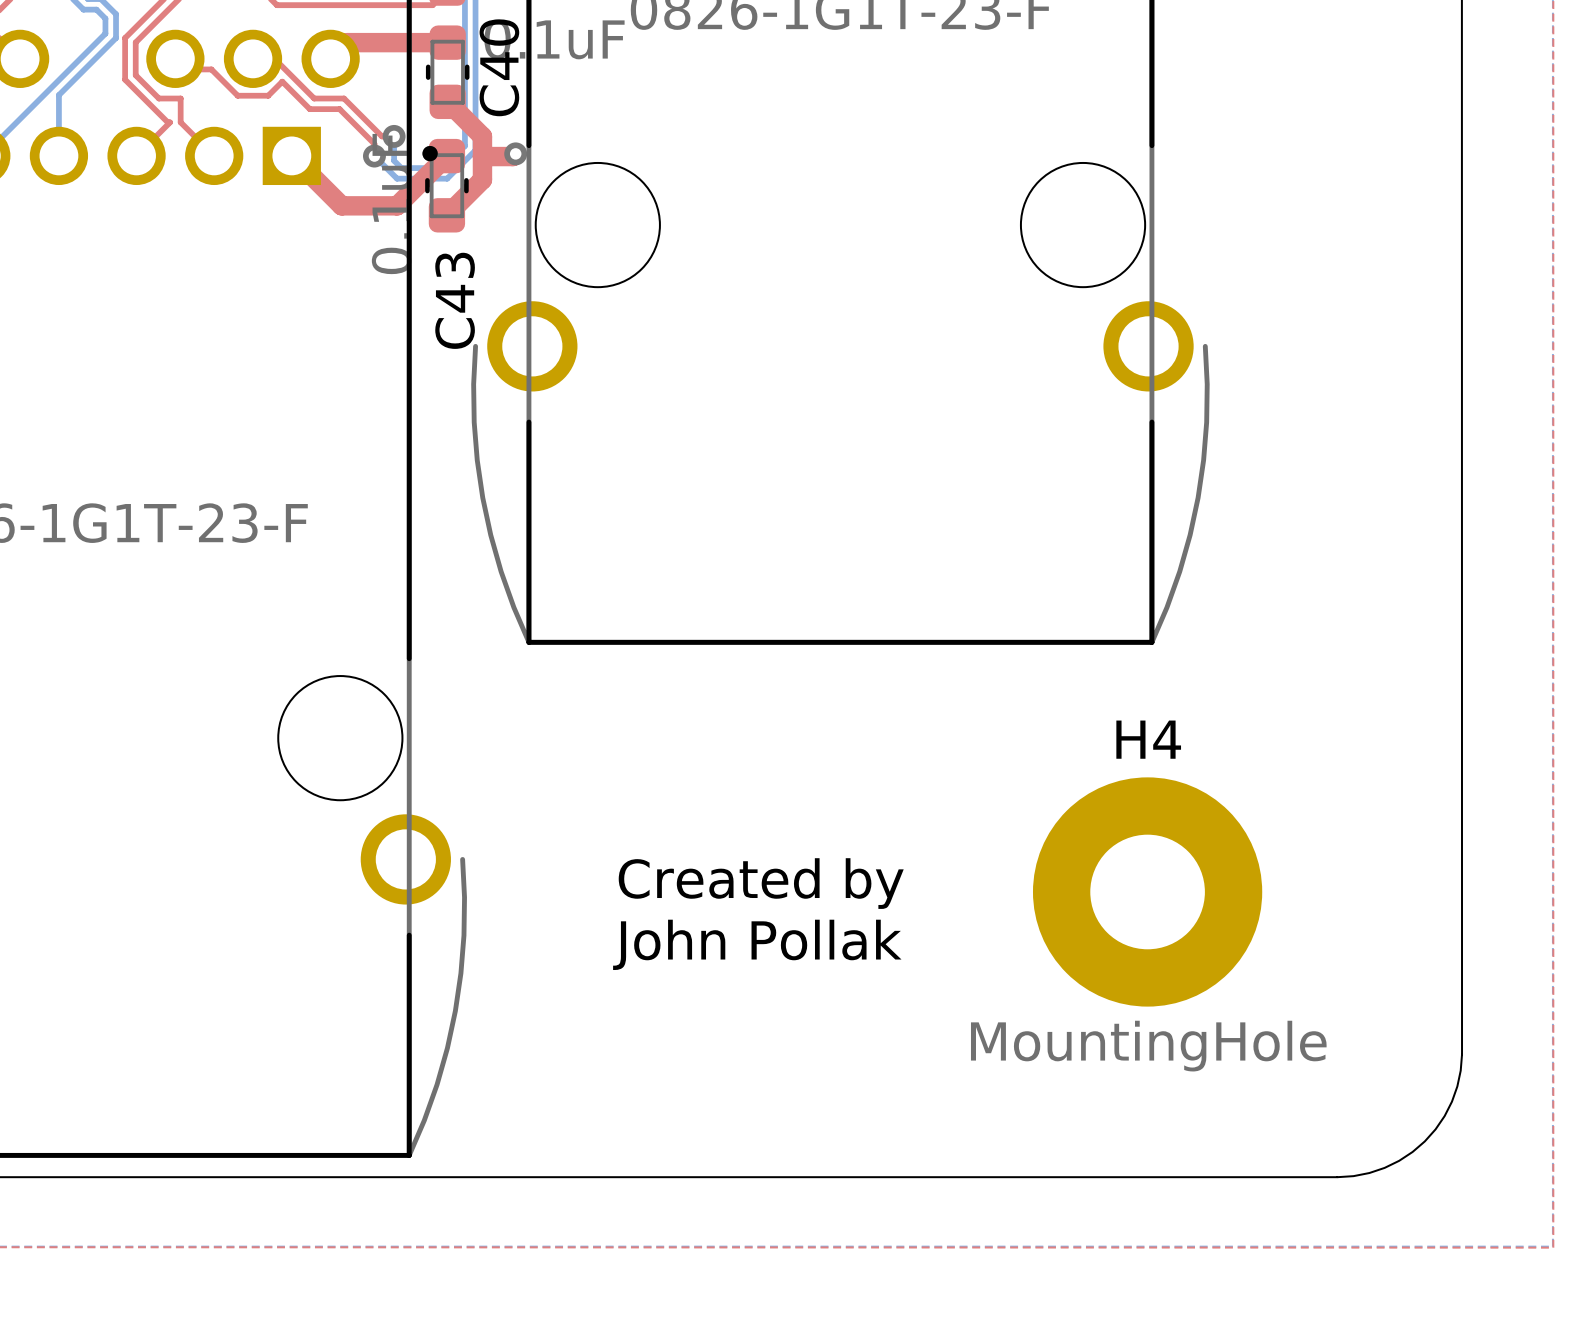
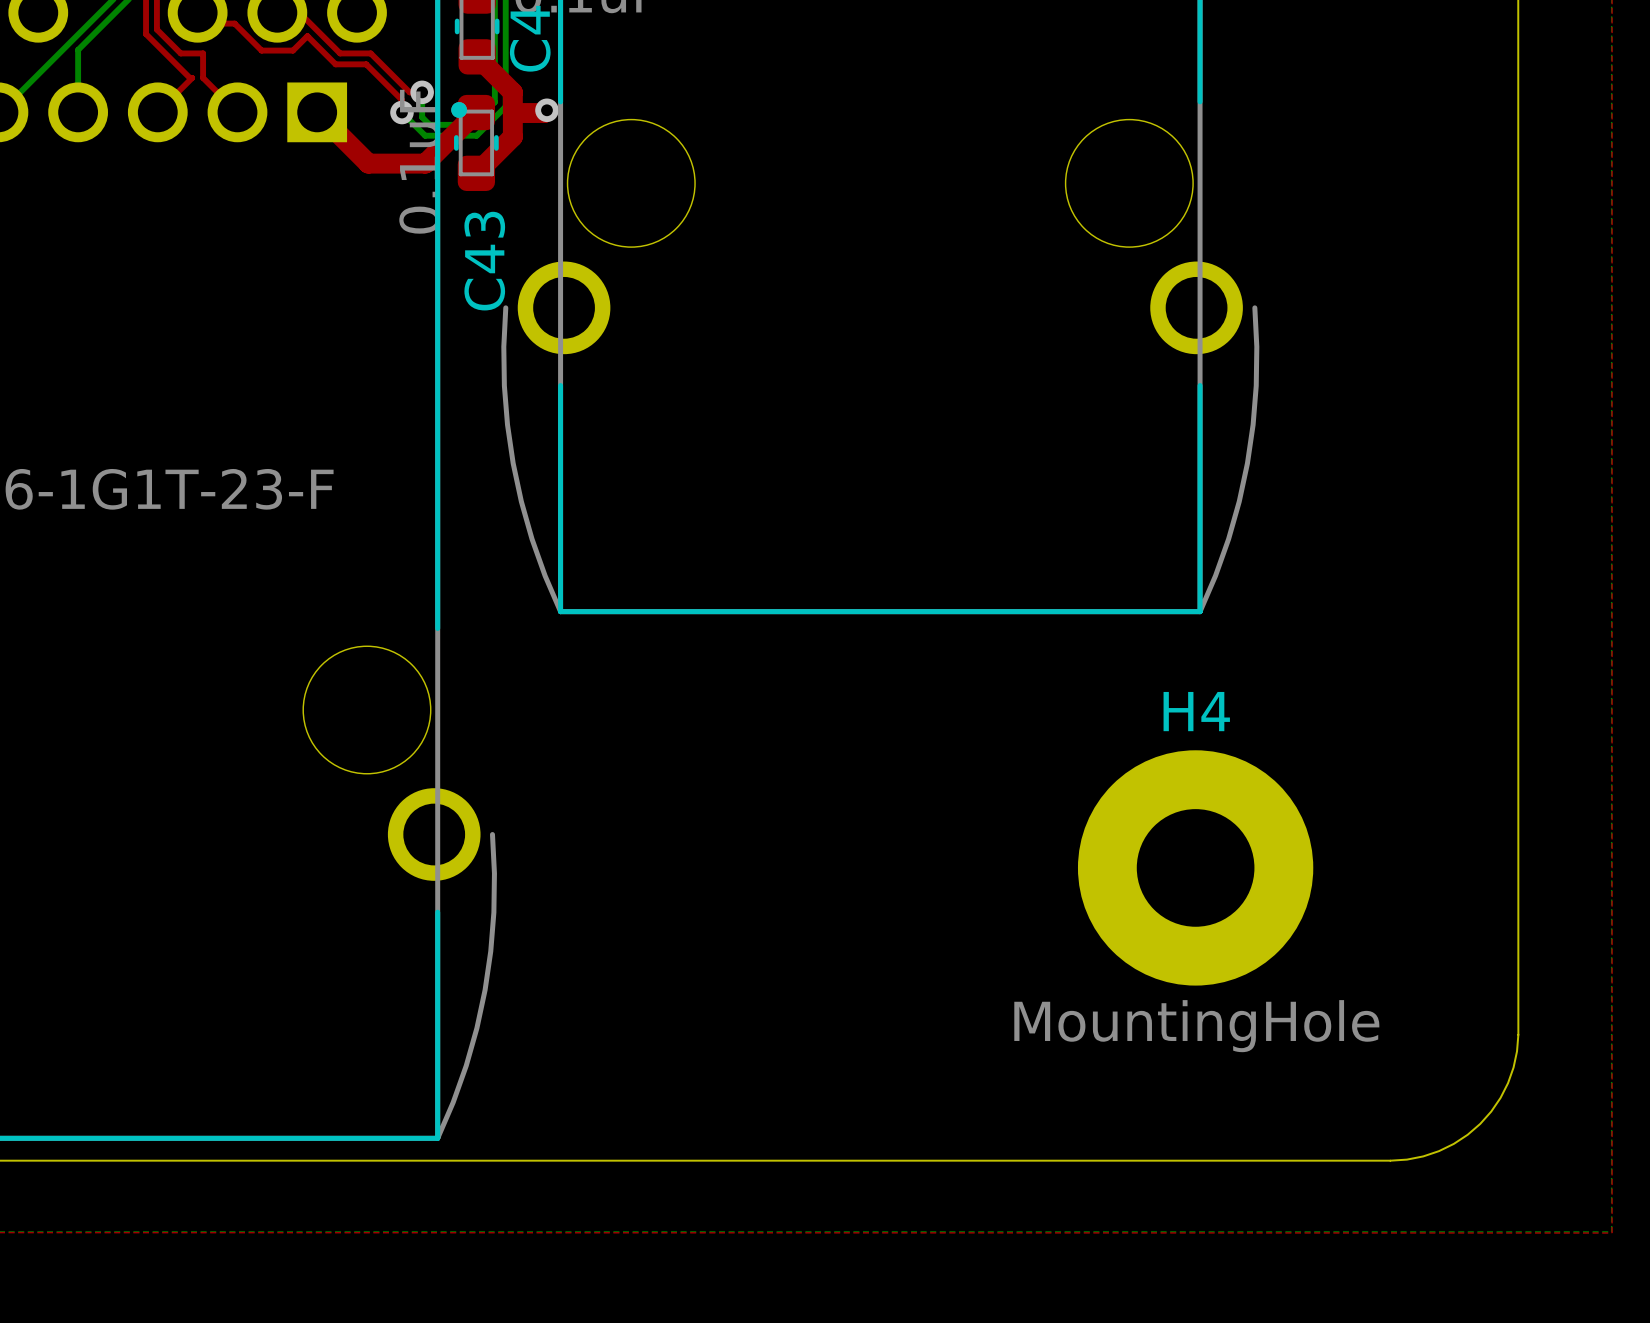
text: Created by (761, 883) -> none
text: John Pollak (757, 944) -> none

